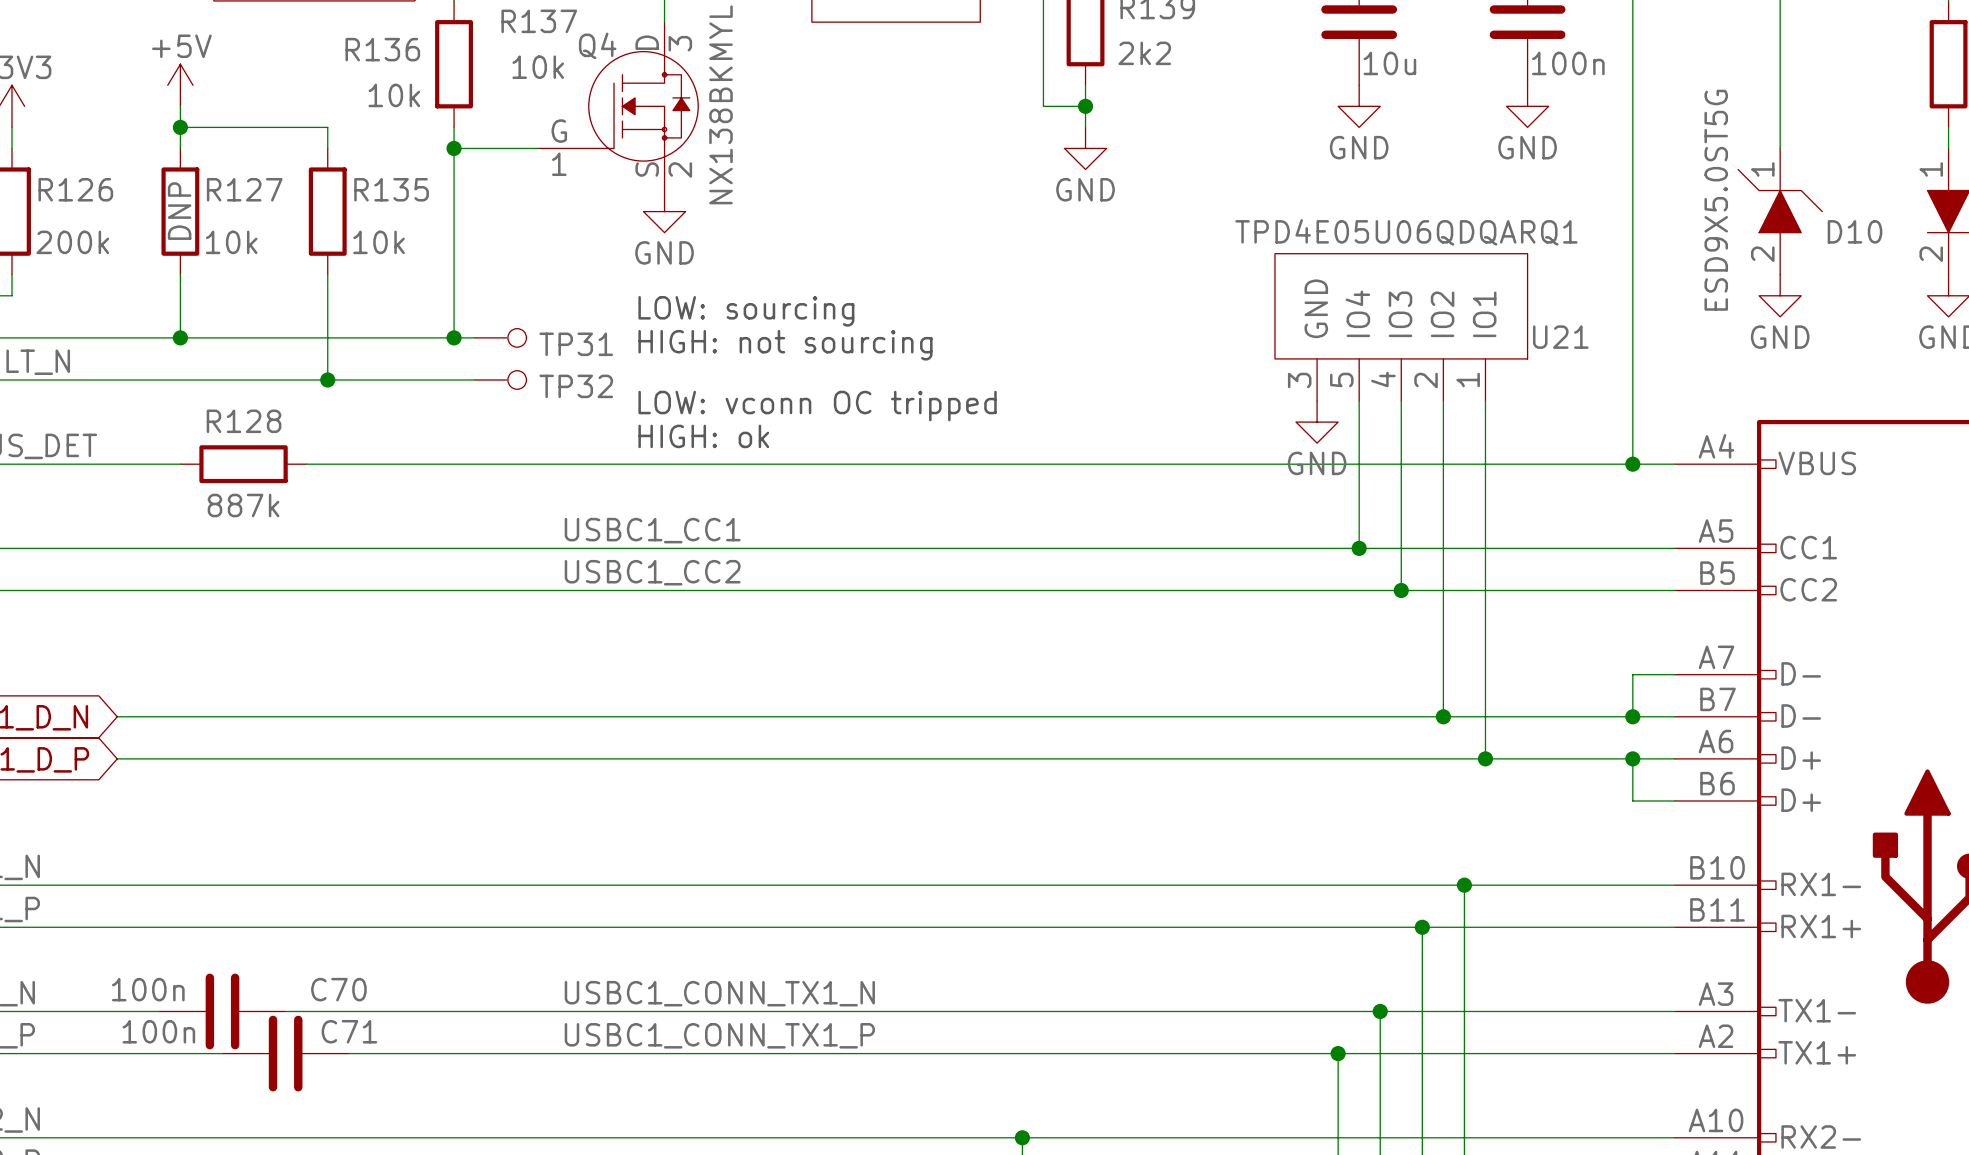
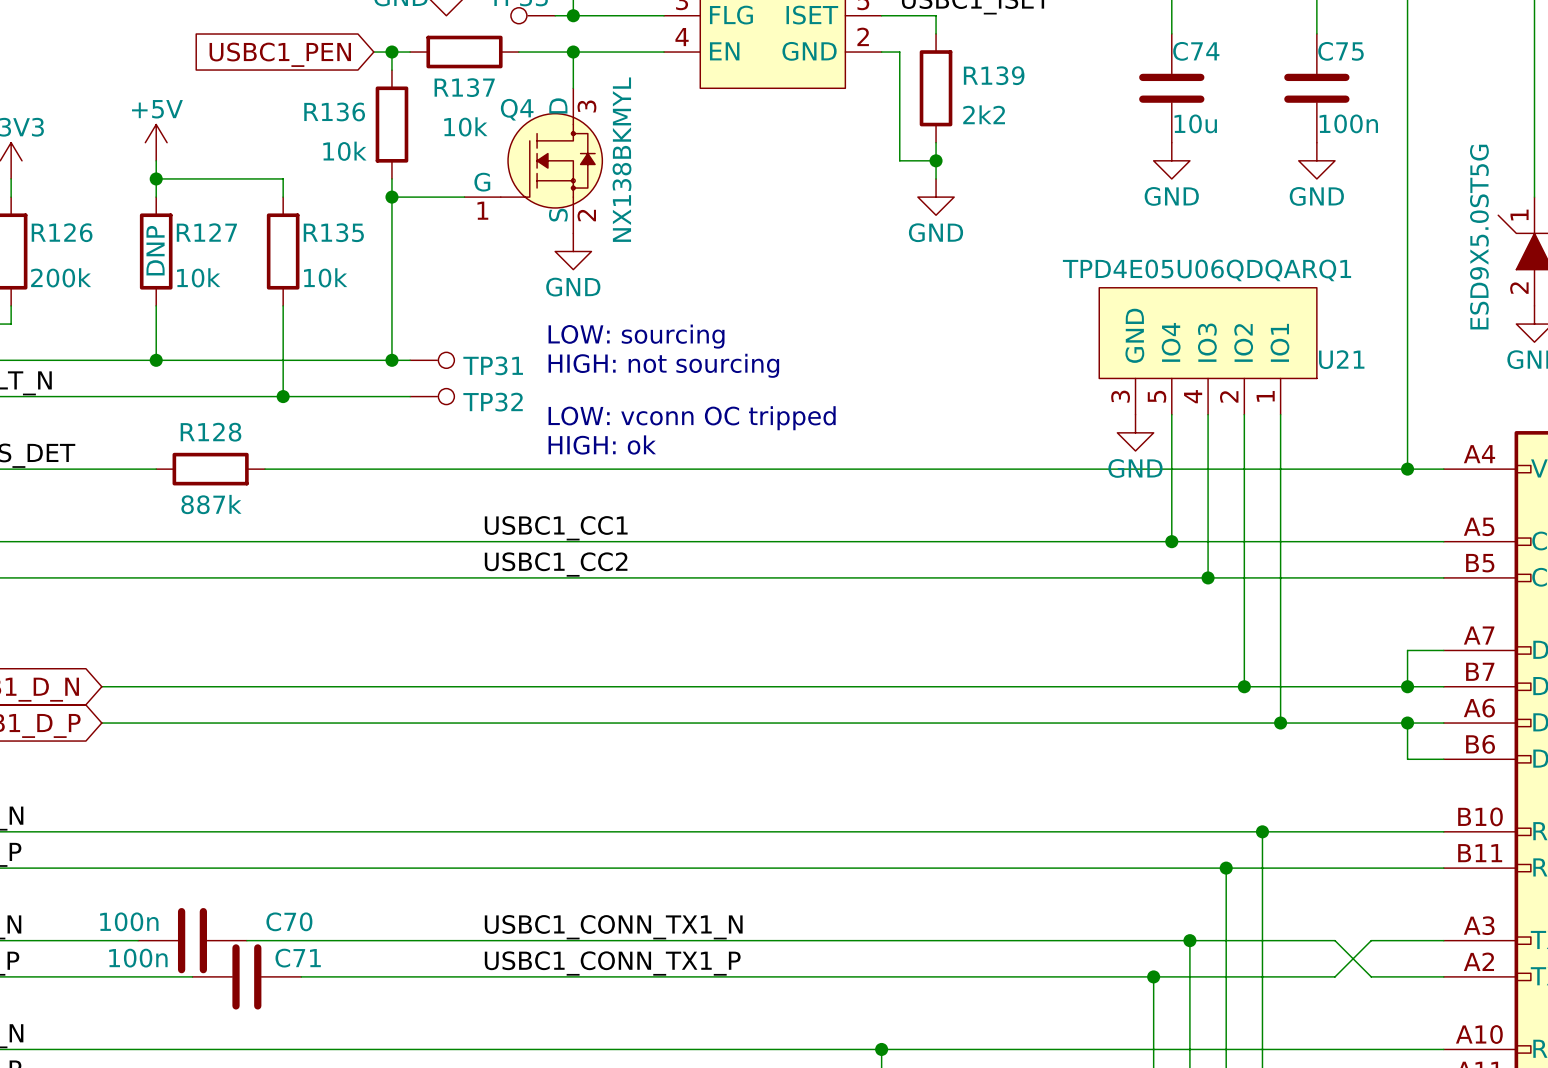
wire: (1548, 1011) (1590, 1011) -> (1335, 940) (1371, 976)
wire: (1548, 1053) (1590, 1053) -> (1335, 976) (1371, 940)

